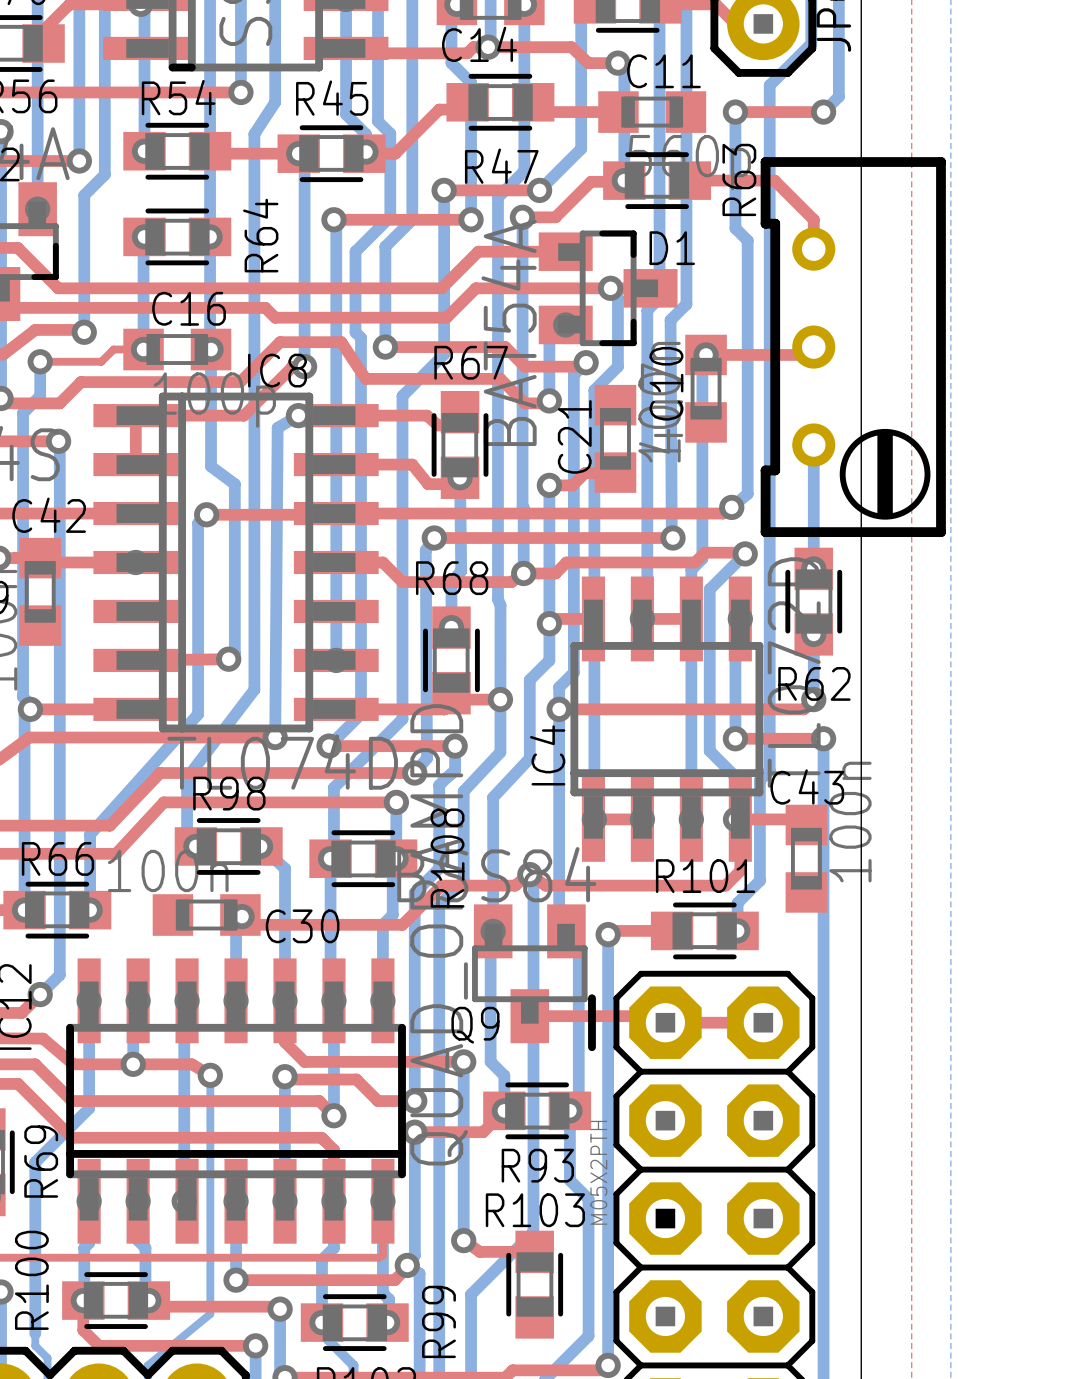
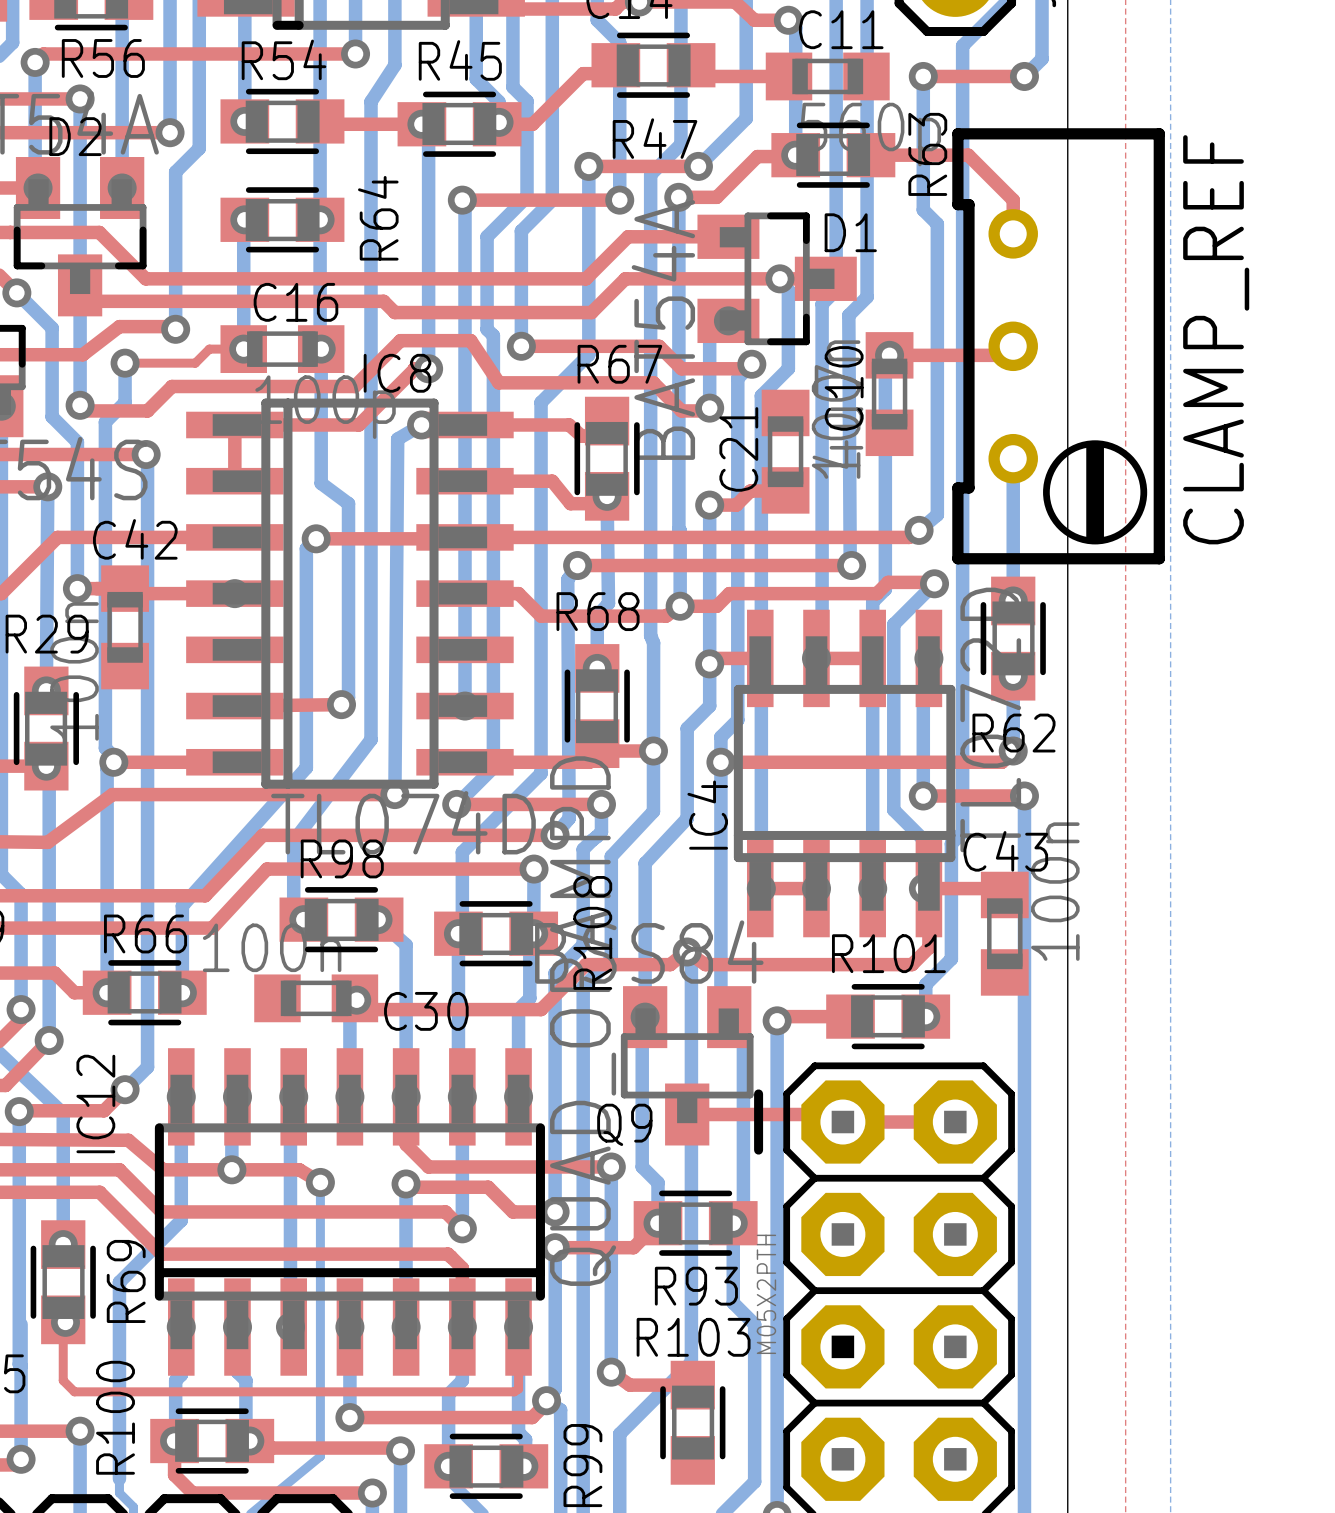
CLAMP_REF name: none -> CLAMP_REF (1216, 339)

